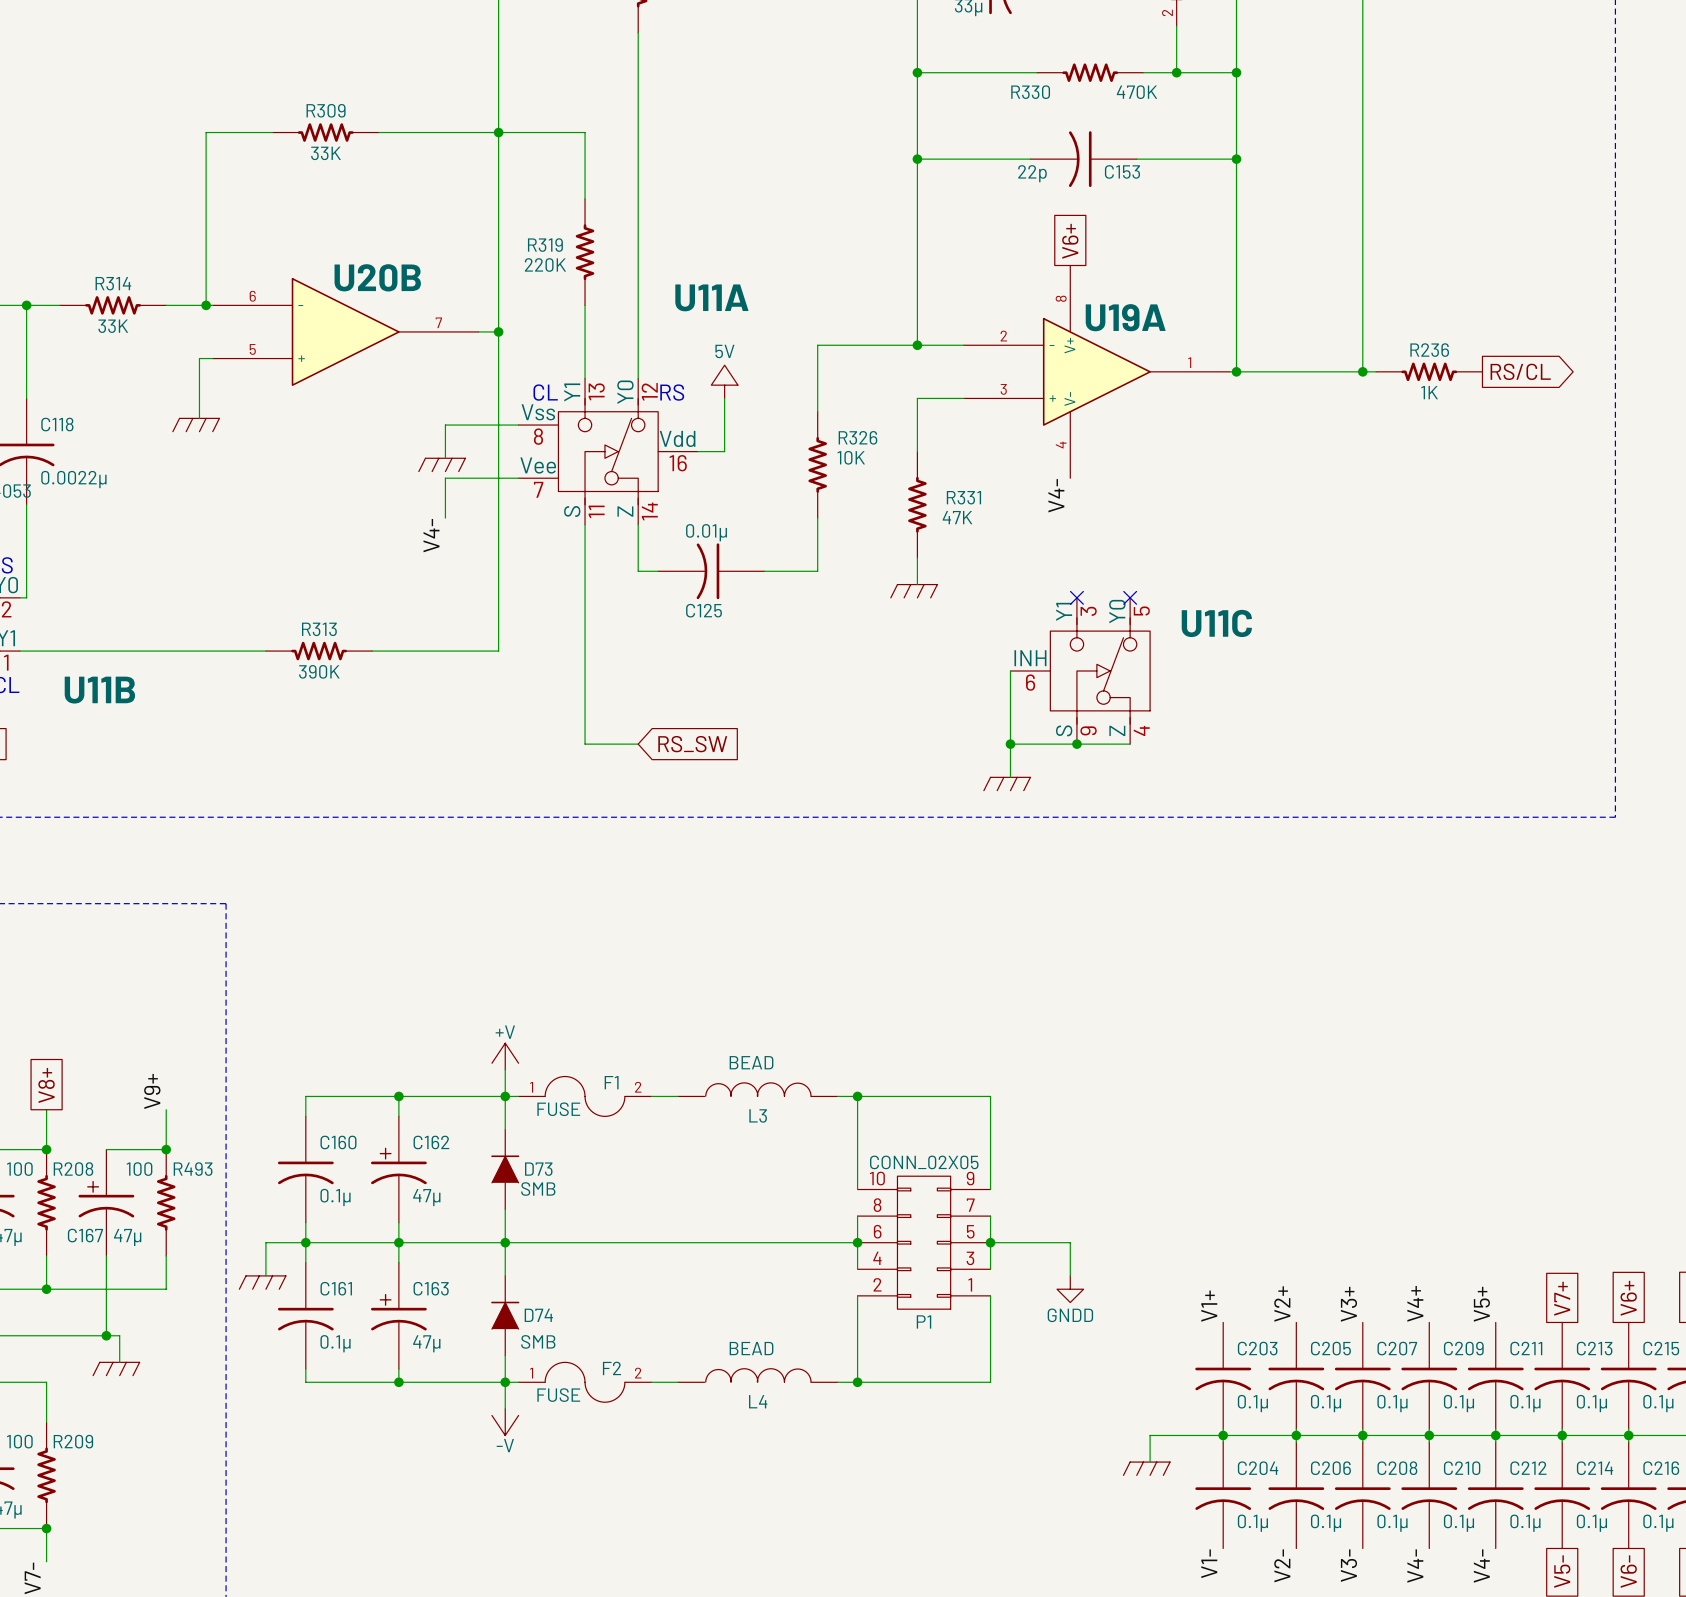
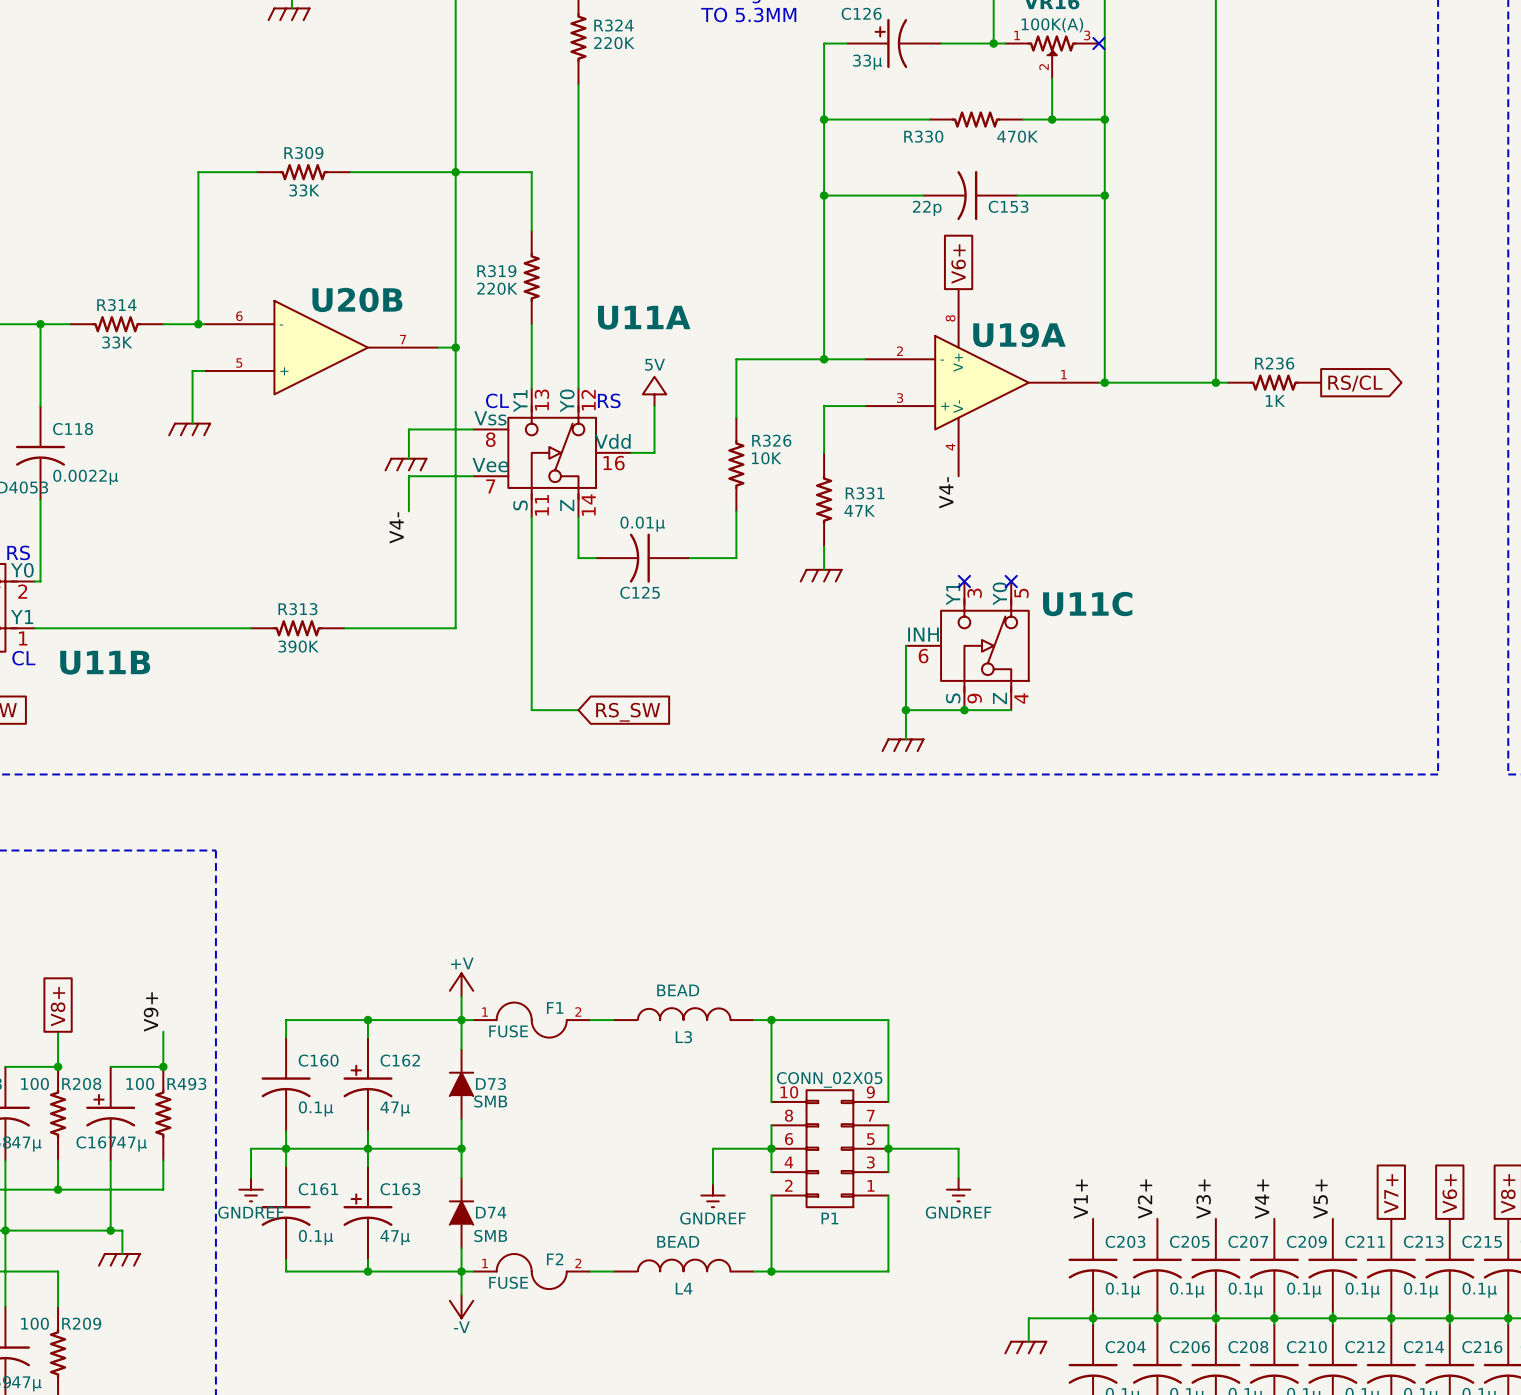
wire: (505, 1242) (791, 1242) -> (712, 1183) (712, 1148)
power symbol shape: [239, 1275, 286, 1290] -> [239, 1177, 263, 1202]
power symbol: GNDD (1070, 1289) -> GNDREF (958, 1189)
power symbol: none -> GNDREF (712, 1195)
power symbol text: none -> GNDREF (251, 1212)

